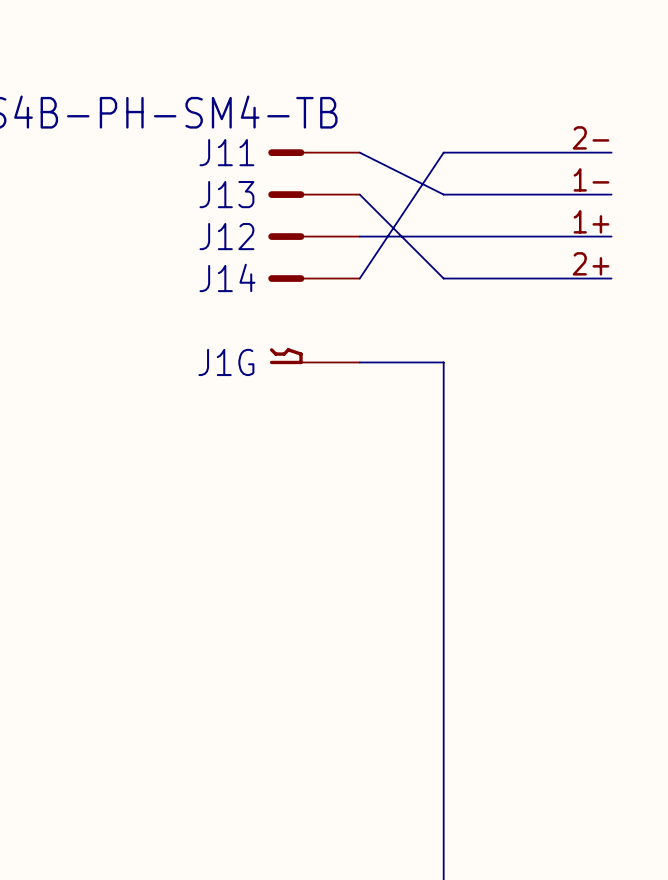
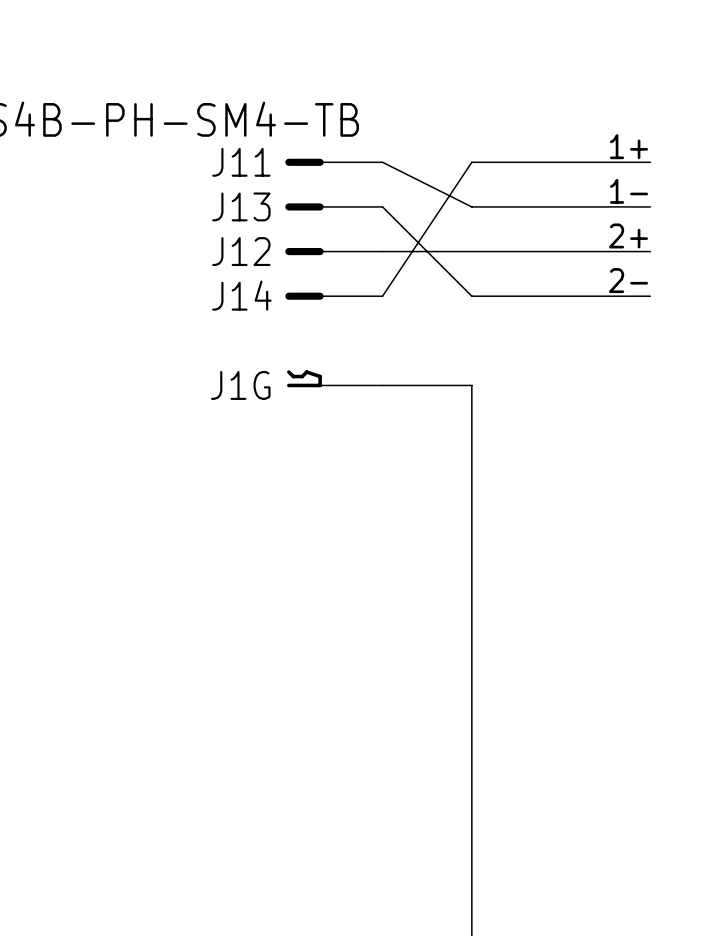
label: 2- (591, 137) -> 1+ (629, 146)
label: 1+ (591, 221) -> 2+ (628, 235)
label: 2+ (591, 263) -> 2- (628, 280)

